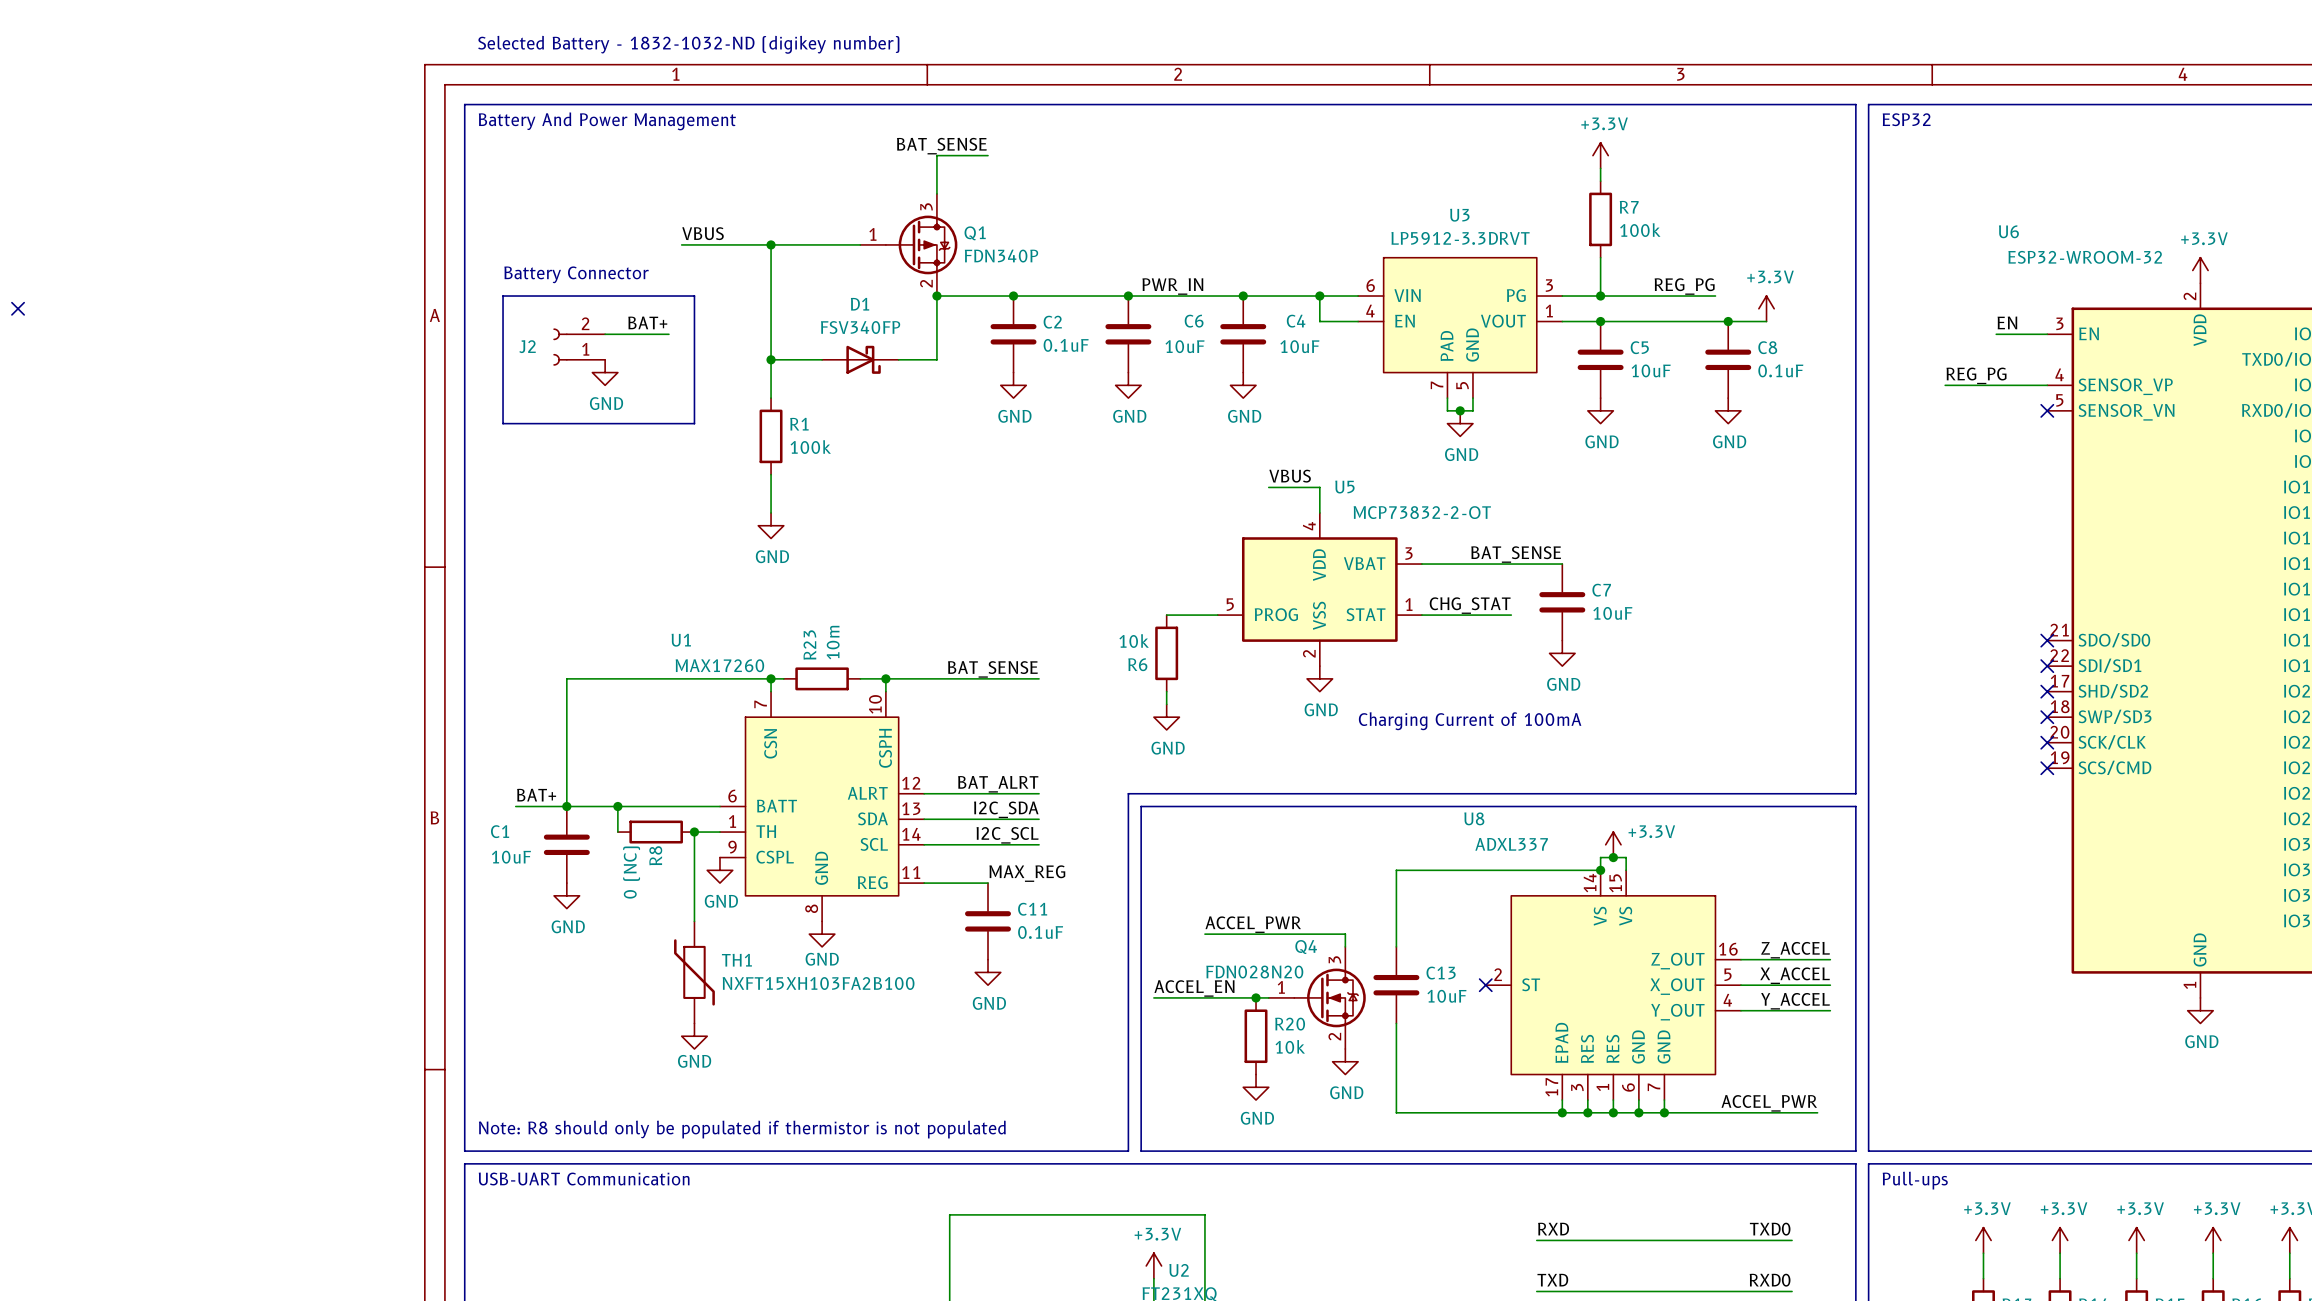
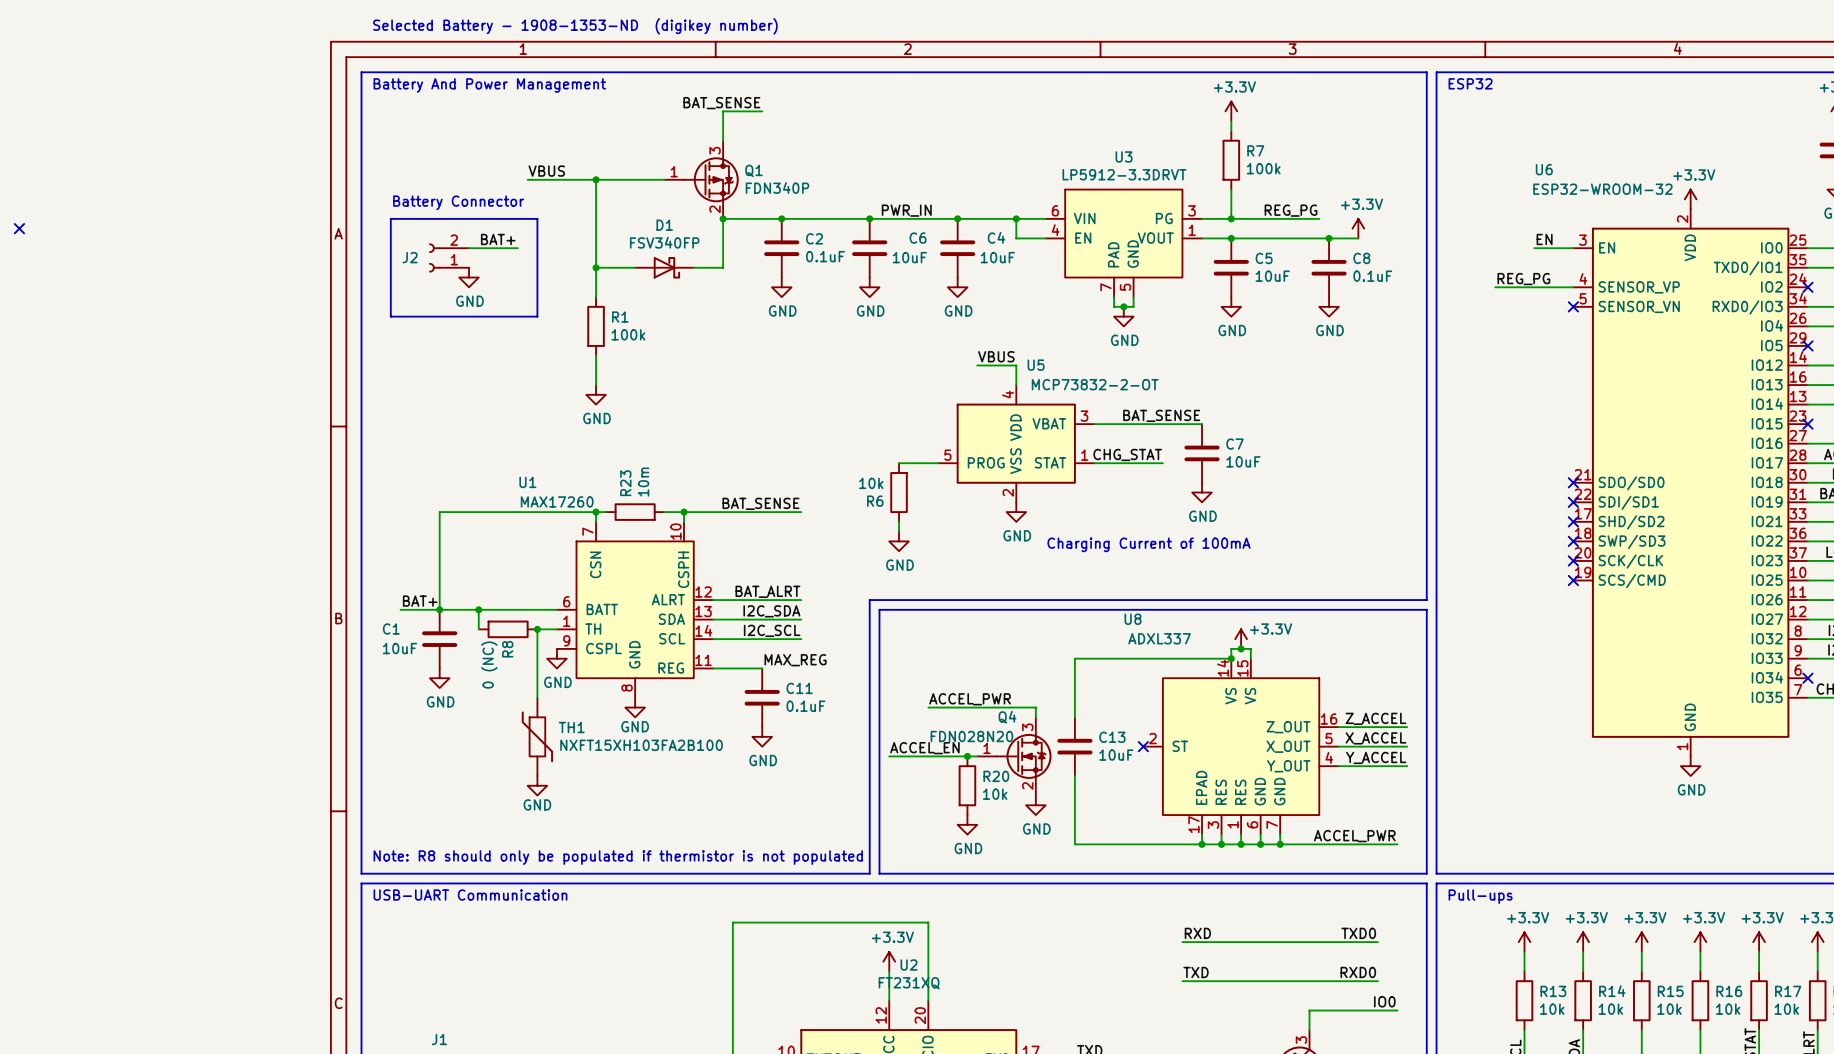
text: Selected Battery - 1832-1032-ND (digikey number) (688, 44) -> Selected Battery - 1908-1353-ND (digikey number) (575, 26)

